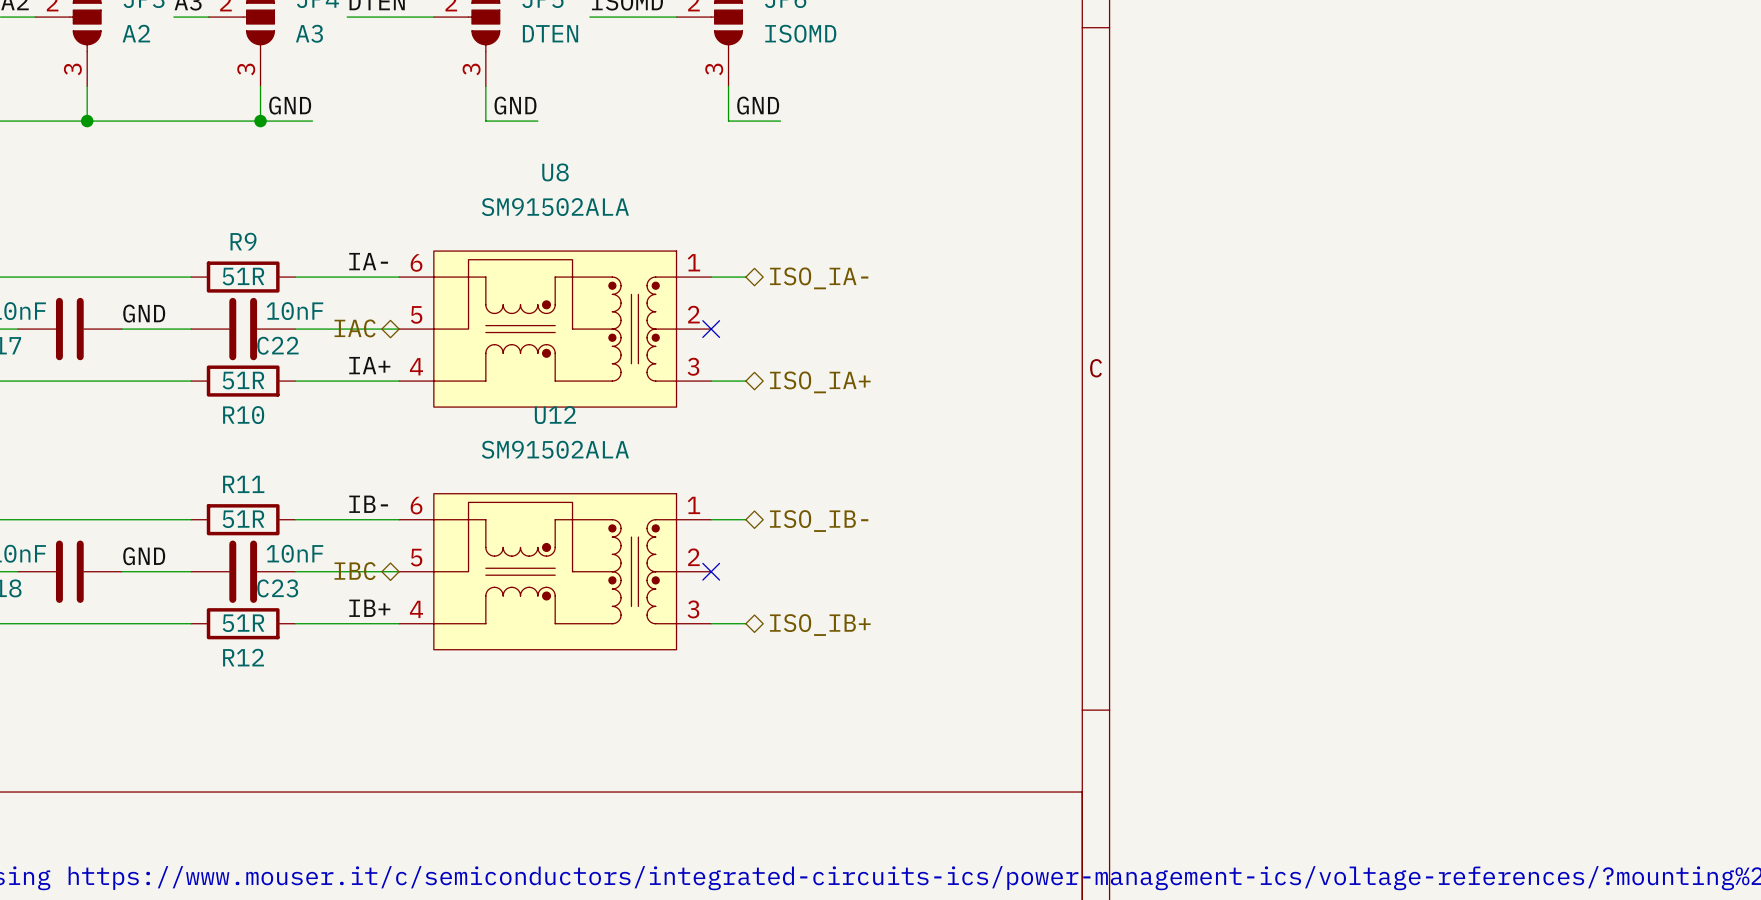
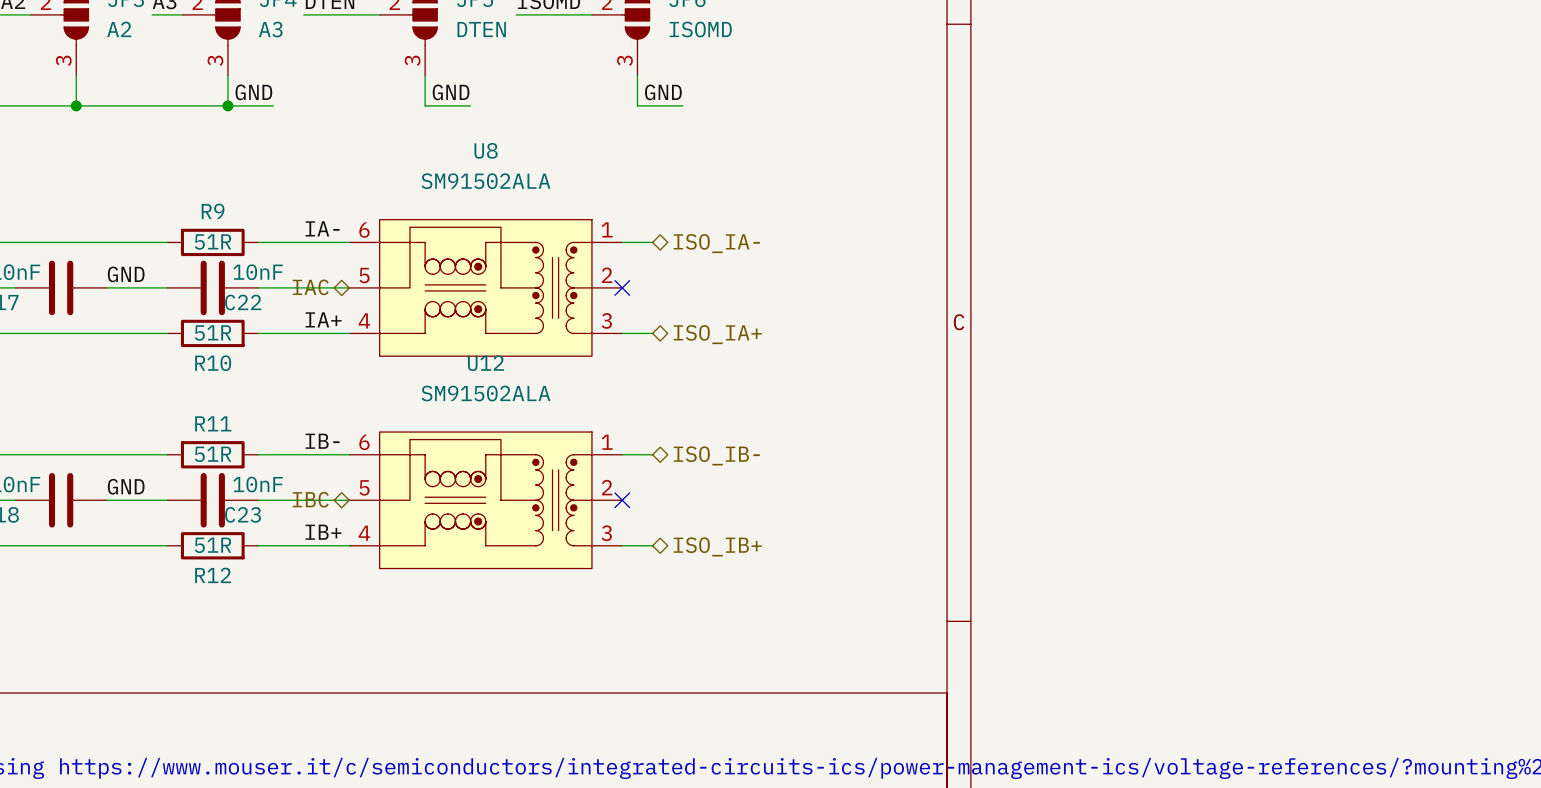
U8 symbol: [399, 251, 712, 408] -> [349, 219, 623, 357]
U12 symbol: [399, 493, 712, 650] -> [349, 432, 623, 569]

